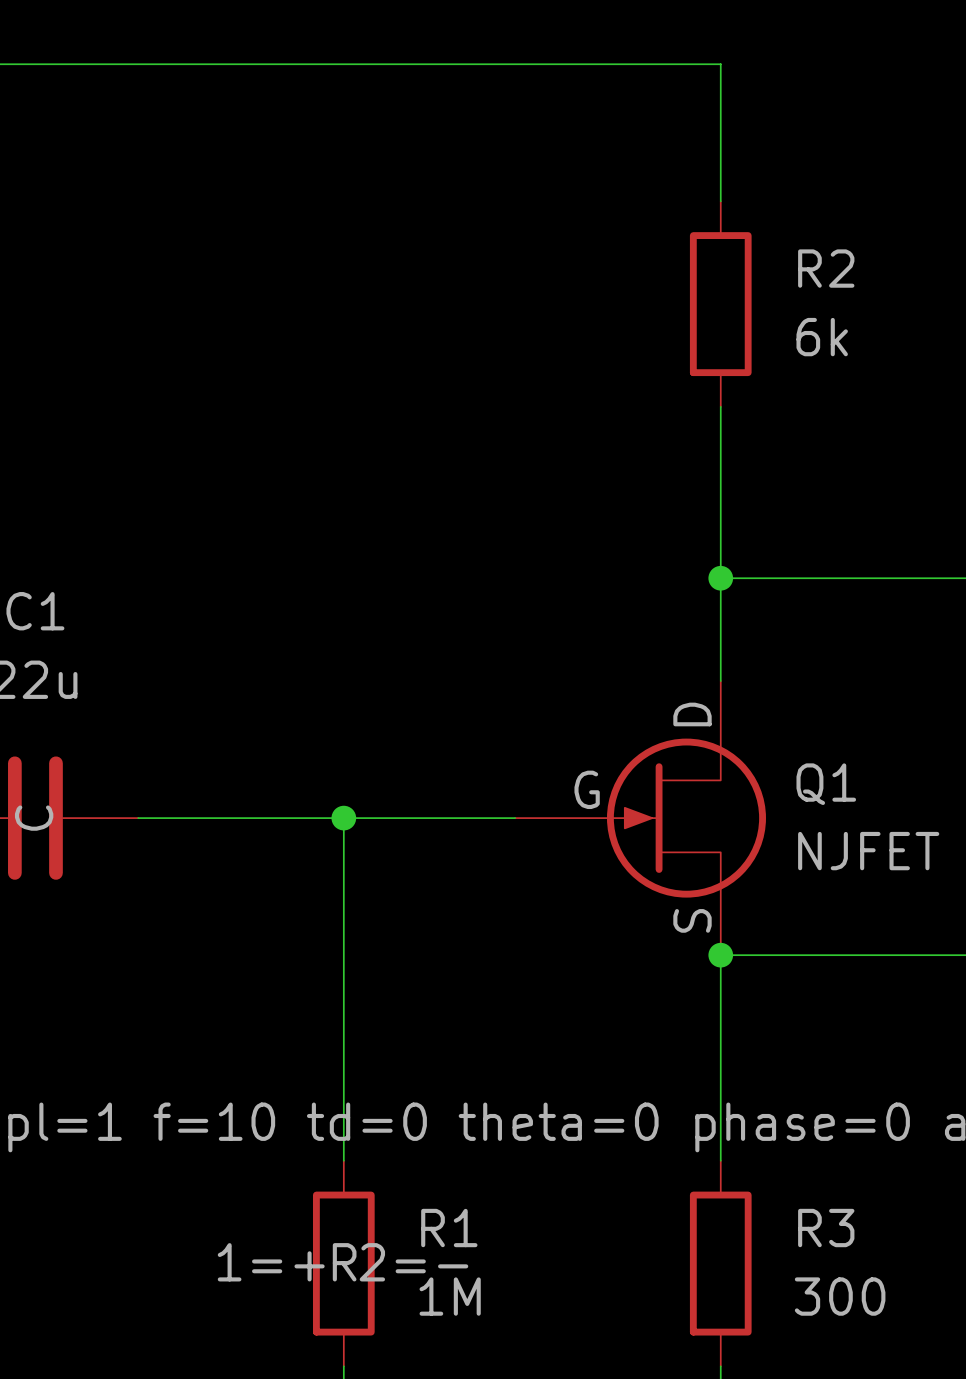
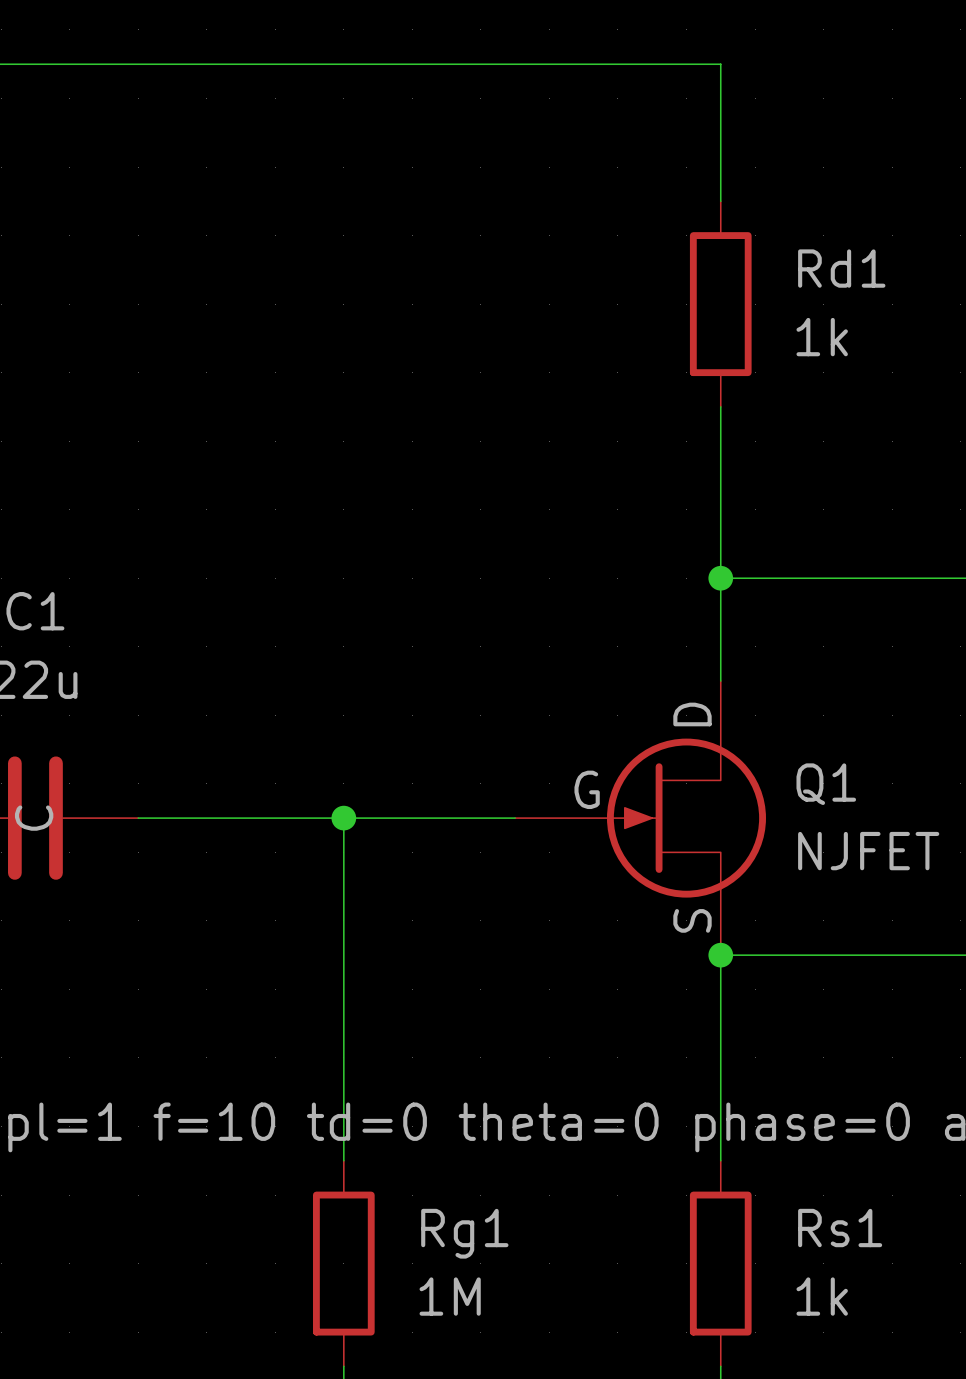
R2 name: R2 (826, 268) -> Rd1 (841, 268)
R2 value: 6k (822, 337) -> 1k (822, 337)
R1 name: R1 (449, 1228) -> Rg1 (464, 1233)
R3 name: R3 (826, 1228) -> Rs1 (840, 1228)
R1 text: 1=+ 2=- (343, 1262) -> none
R1 text: R (344, 1262) -> none
R3 value: 300 (840, 1296) -> 1k (822, 1296)

